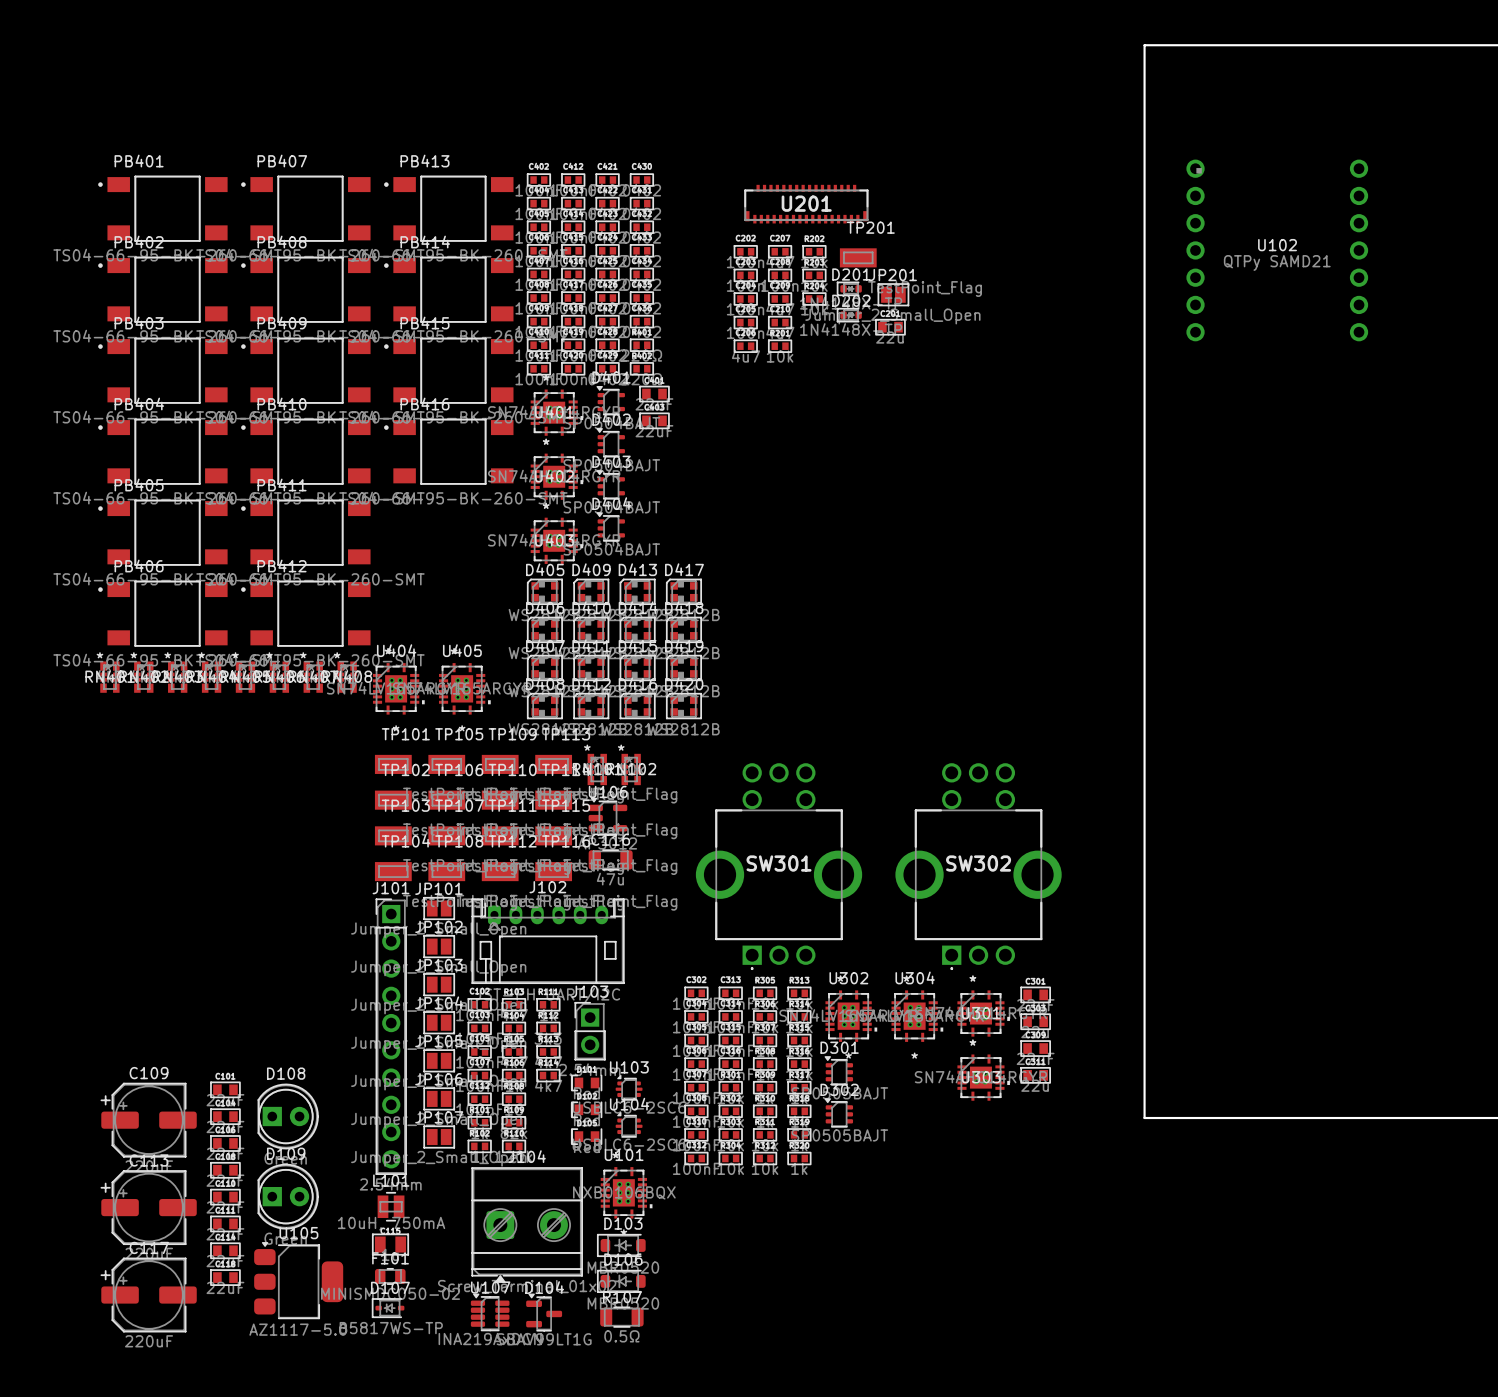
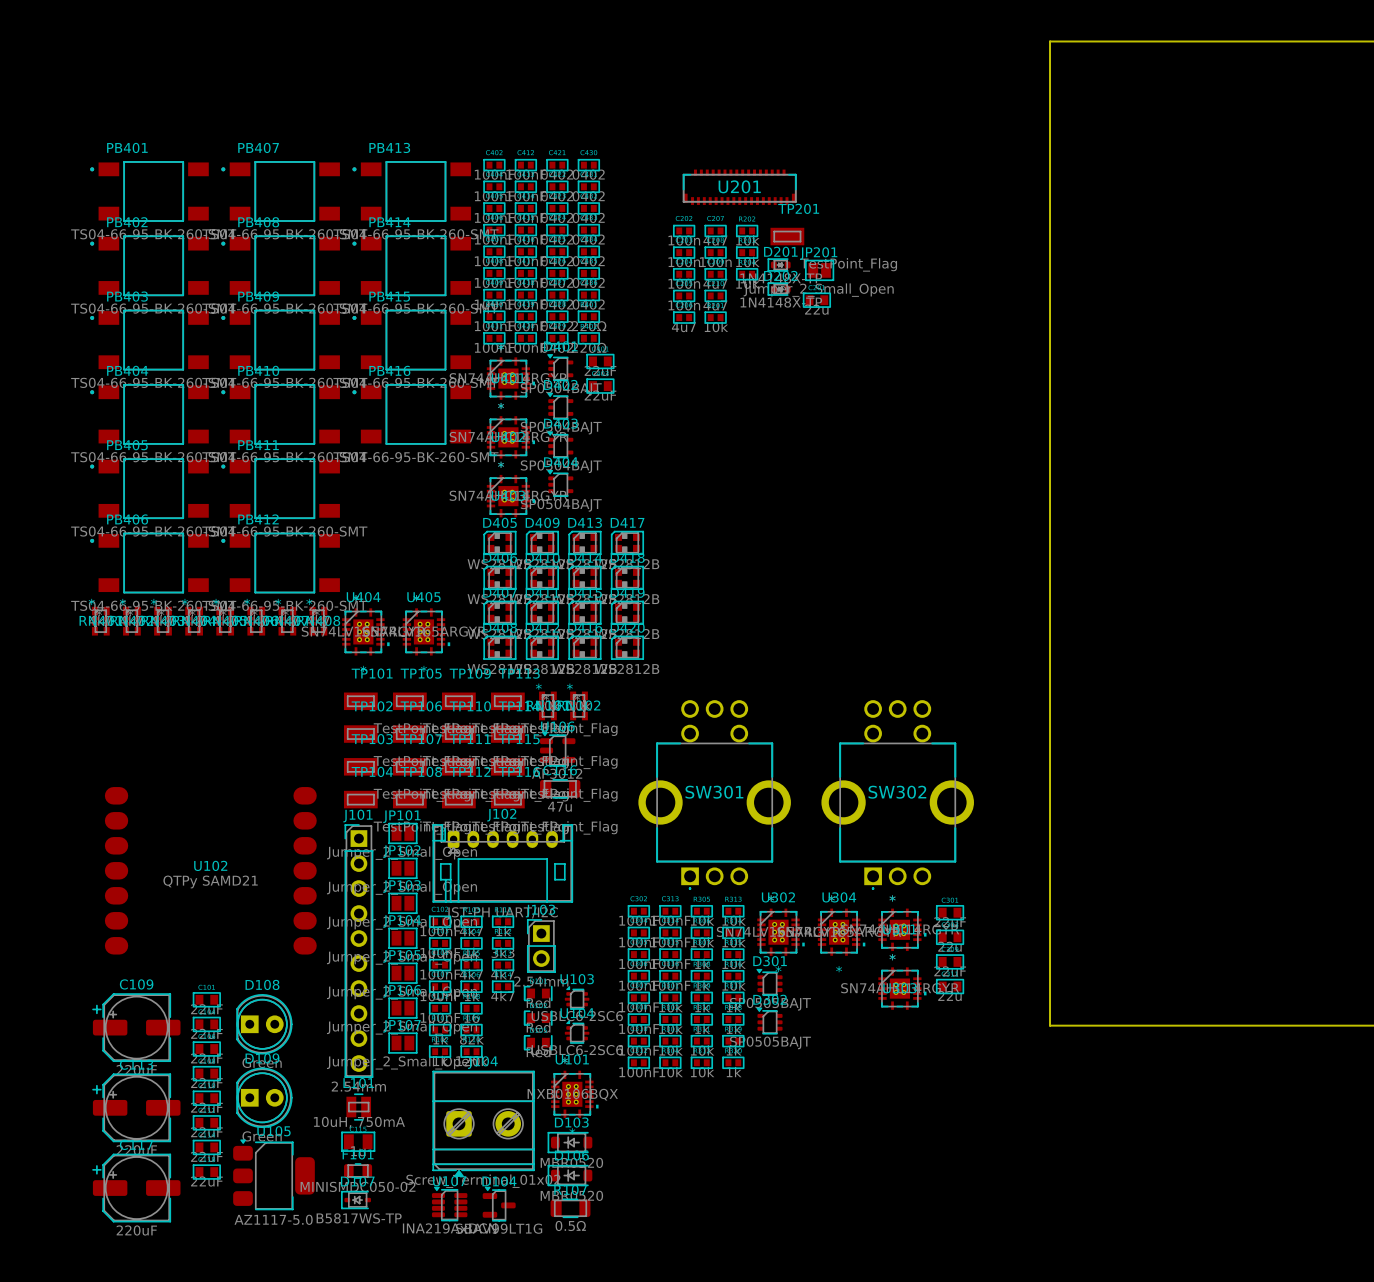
U102 footprint: [1186, 159, 1369, 342] -> [104, 787, 317, 955]

